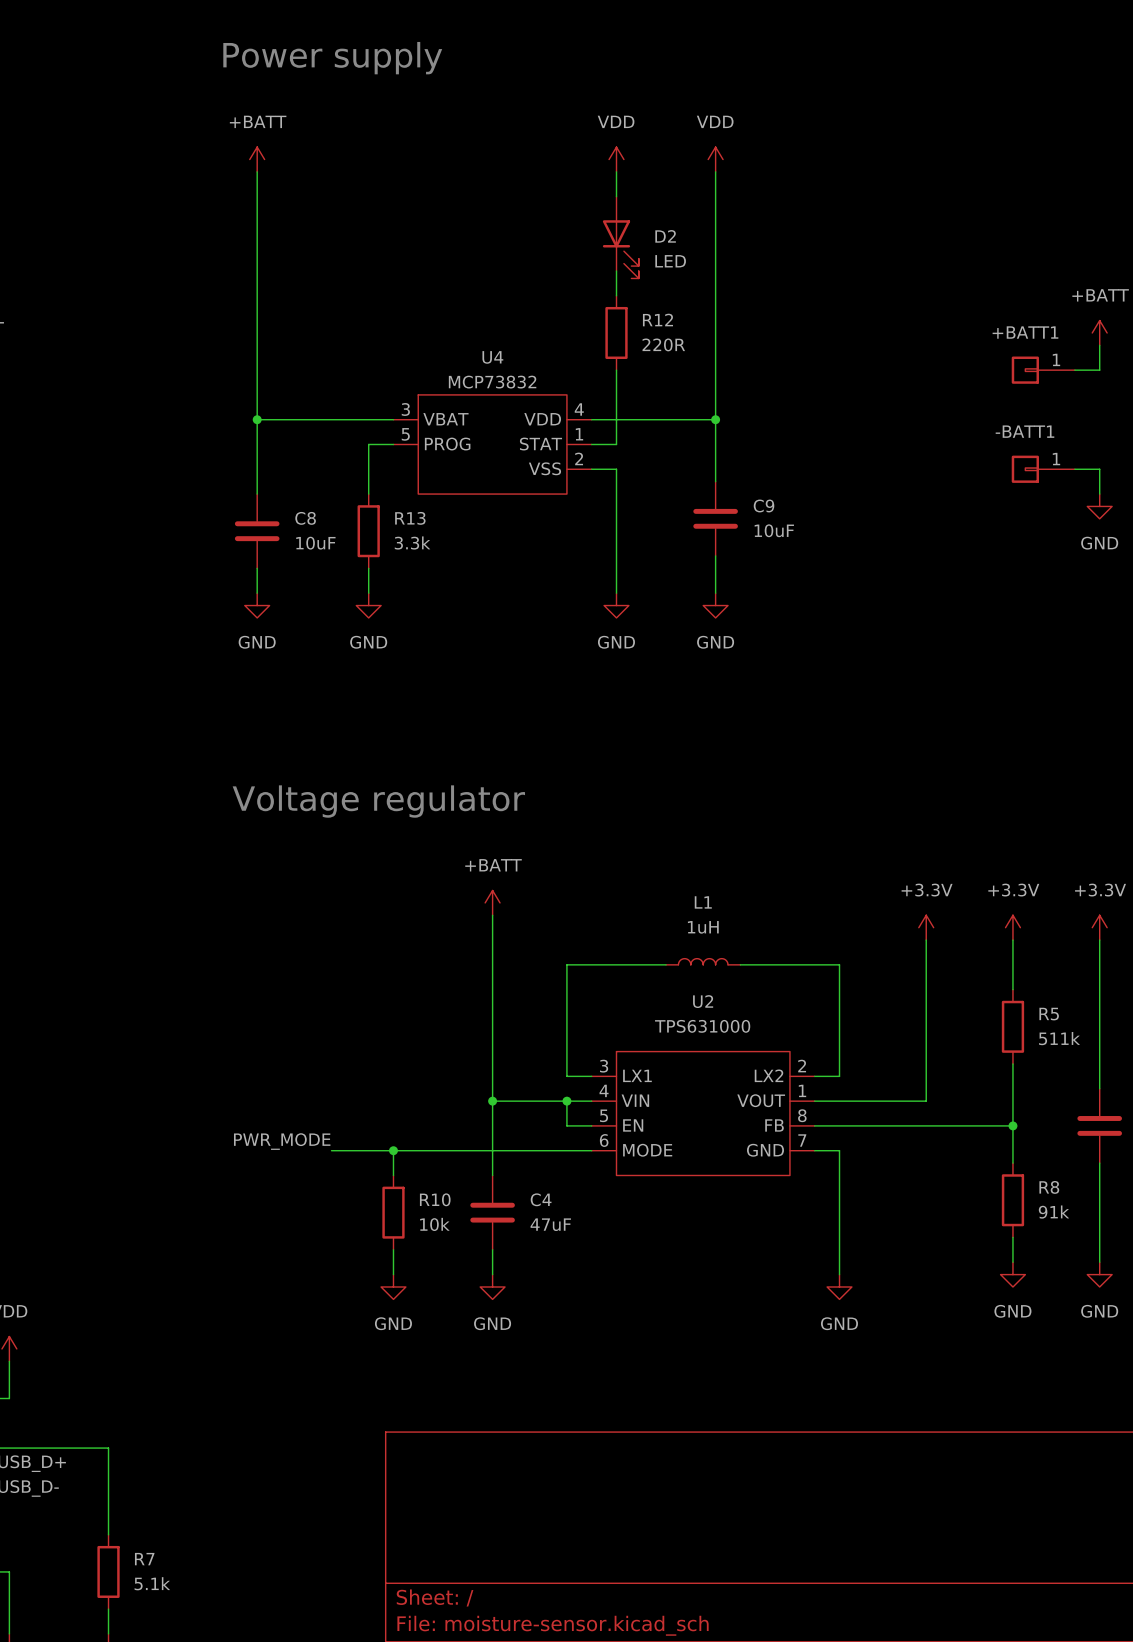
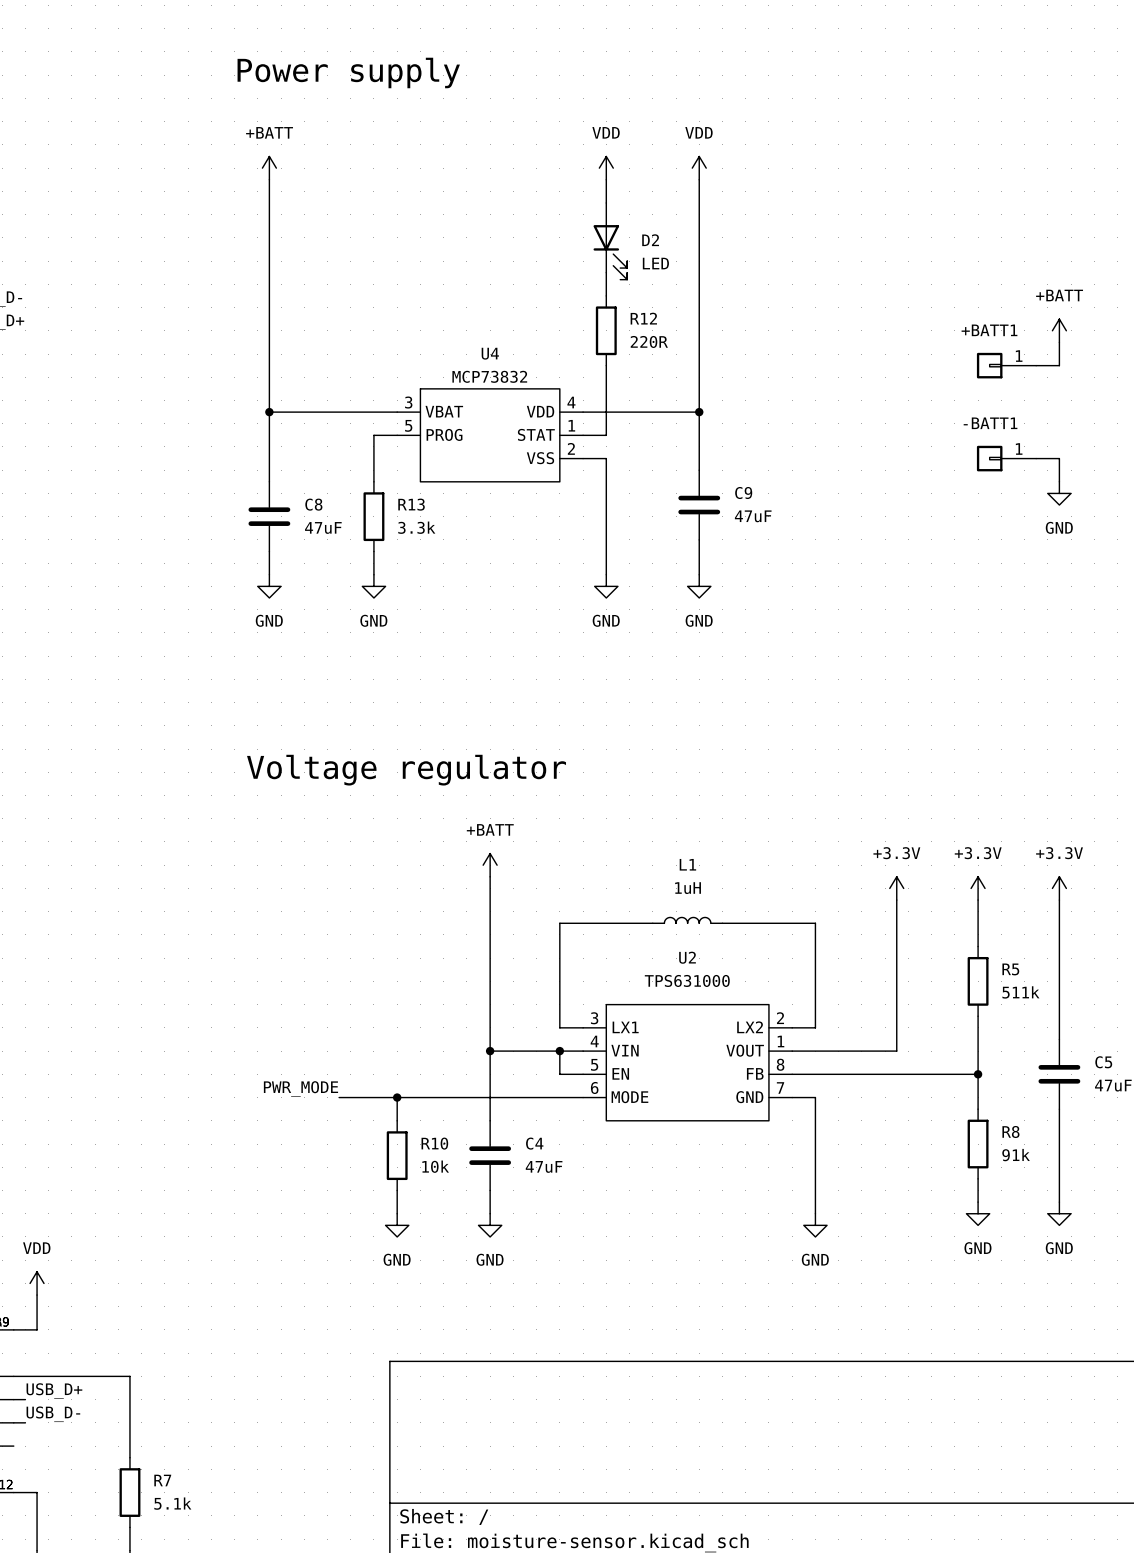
C9 value: 10uF (774, 530) -> 47uF (753, 516)
C8 value: 10uF (315, 543) -> 47uF (323, 527)

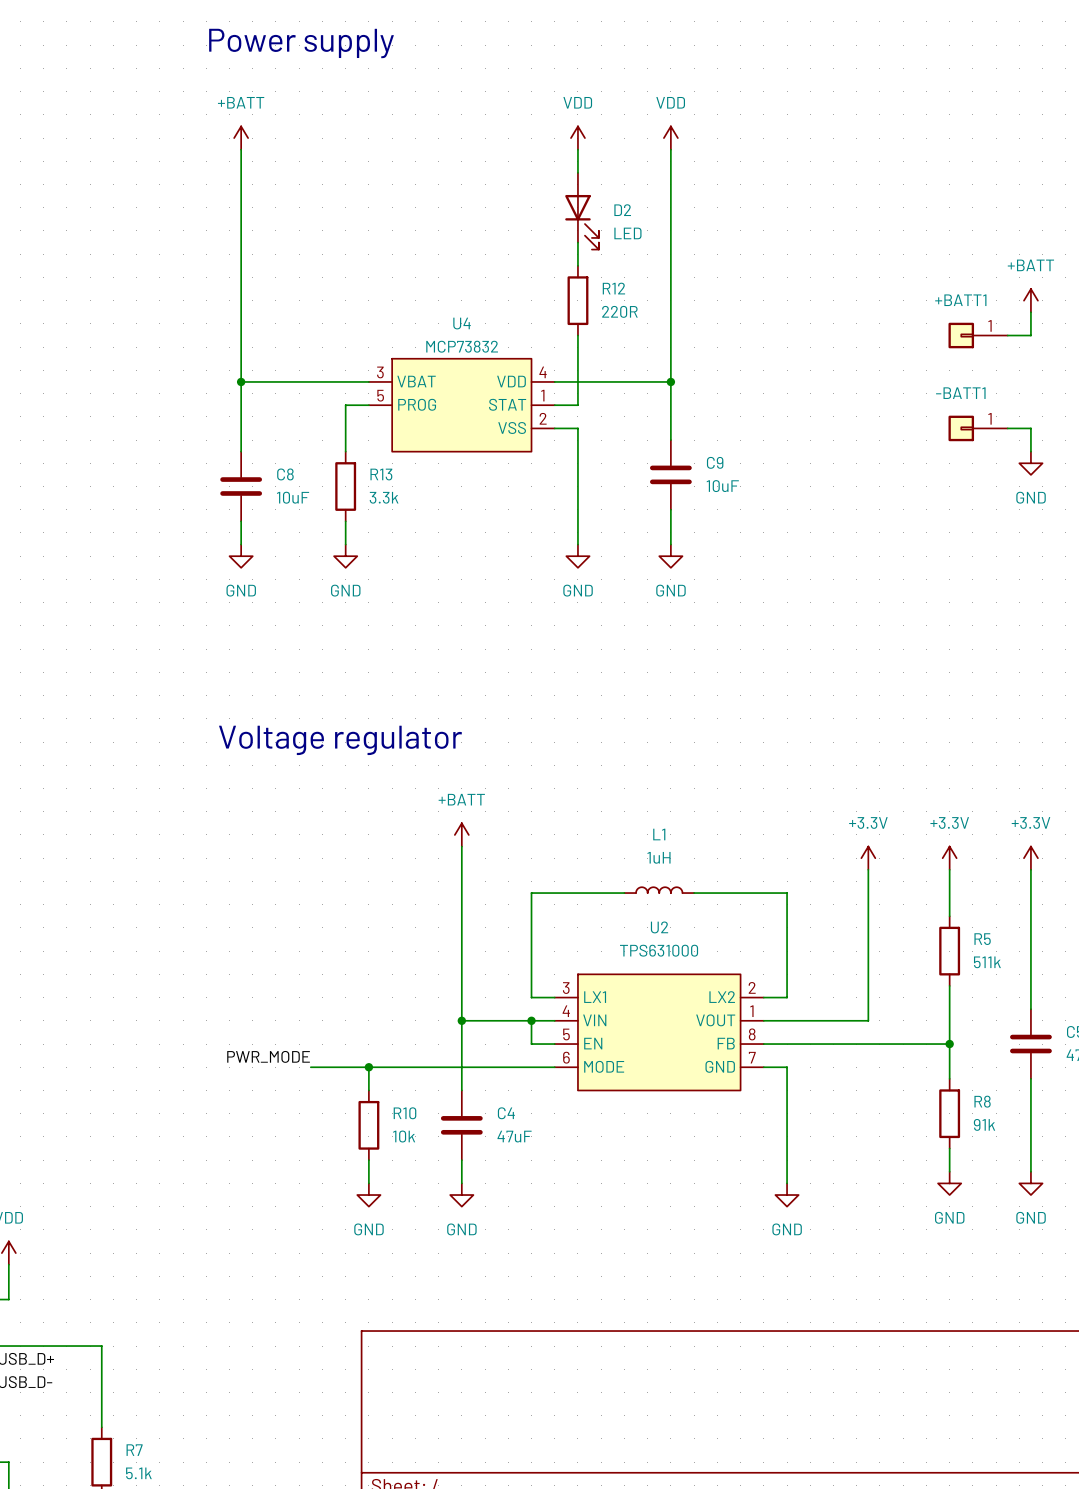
C9 value: 47uF (753, 516) -> 10uF (722, 486)
C8 value: 47uF (323, 527) -> 10uF (293, 497)

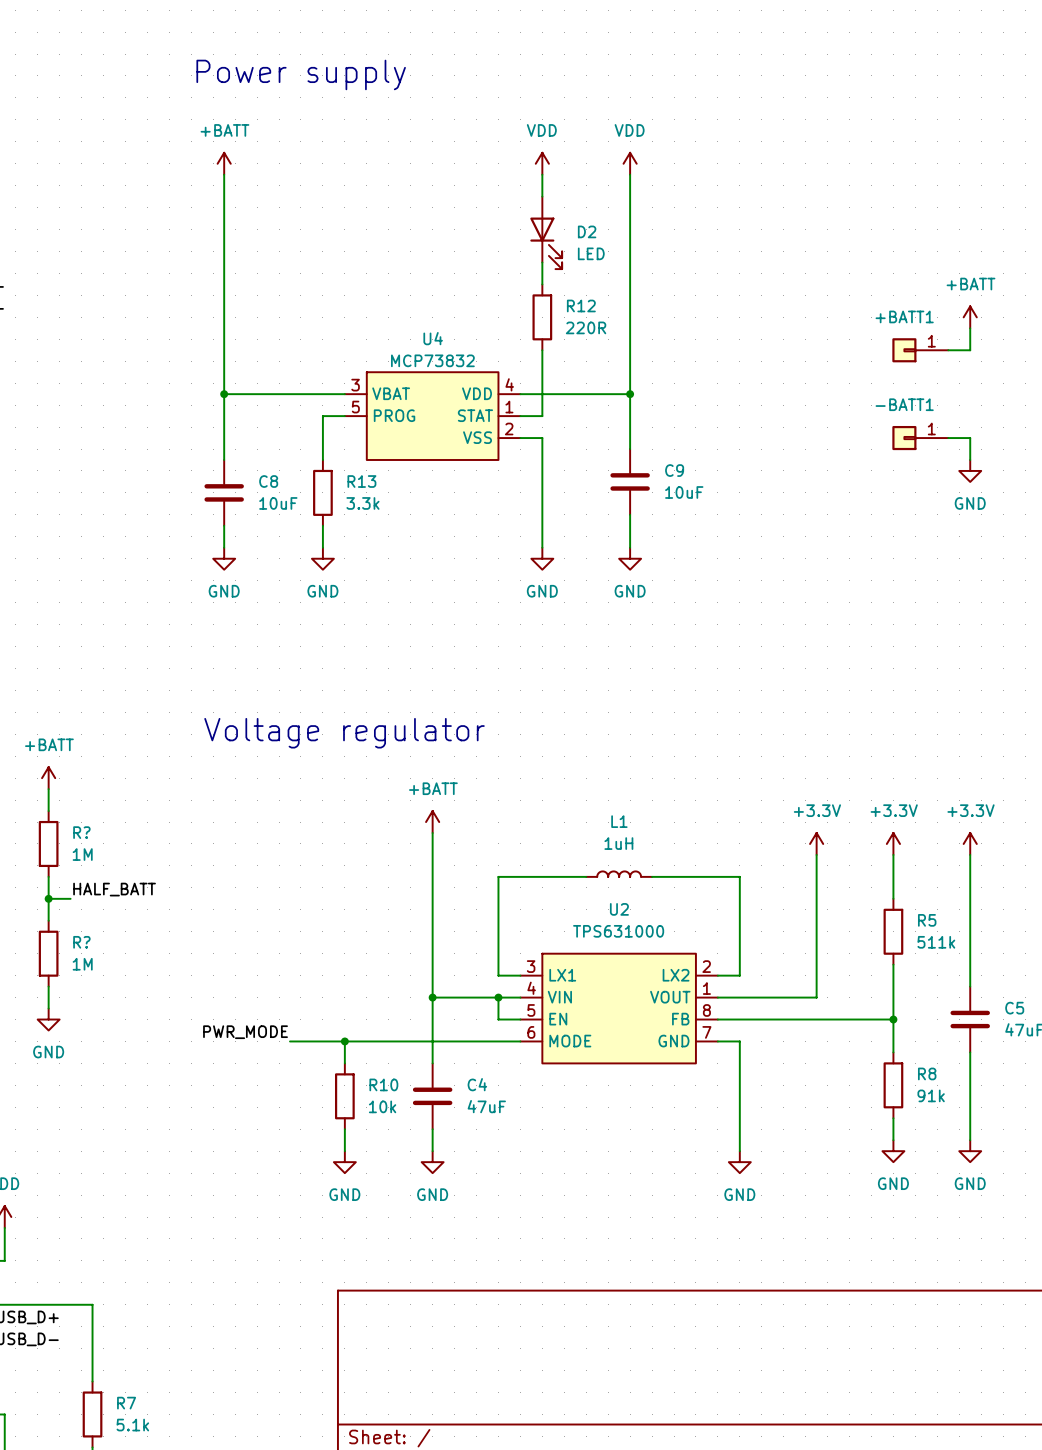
power symbol: none -> +BATT (48, 778)
wire: none -> (48, 789) (48, 811)
R?: none -> 1M (48, 843)
wire: none -> (48, 876) (48, 920)
label: none -> HALF_BATT (114, 889)
wire: none -> (48, 898) (70, 898)
junction: none -> (48, 898)
R?: none -> 1M (48, 953)
wire: none -> (48, 986) (48, 1008)
power symbol: none -> GND (48, 1019)

